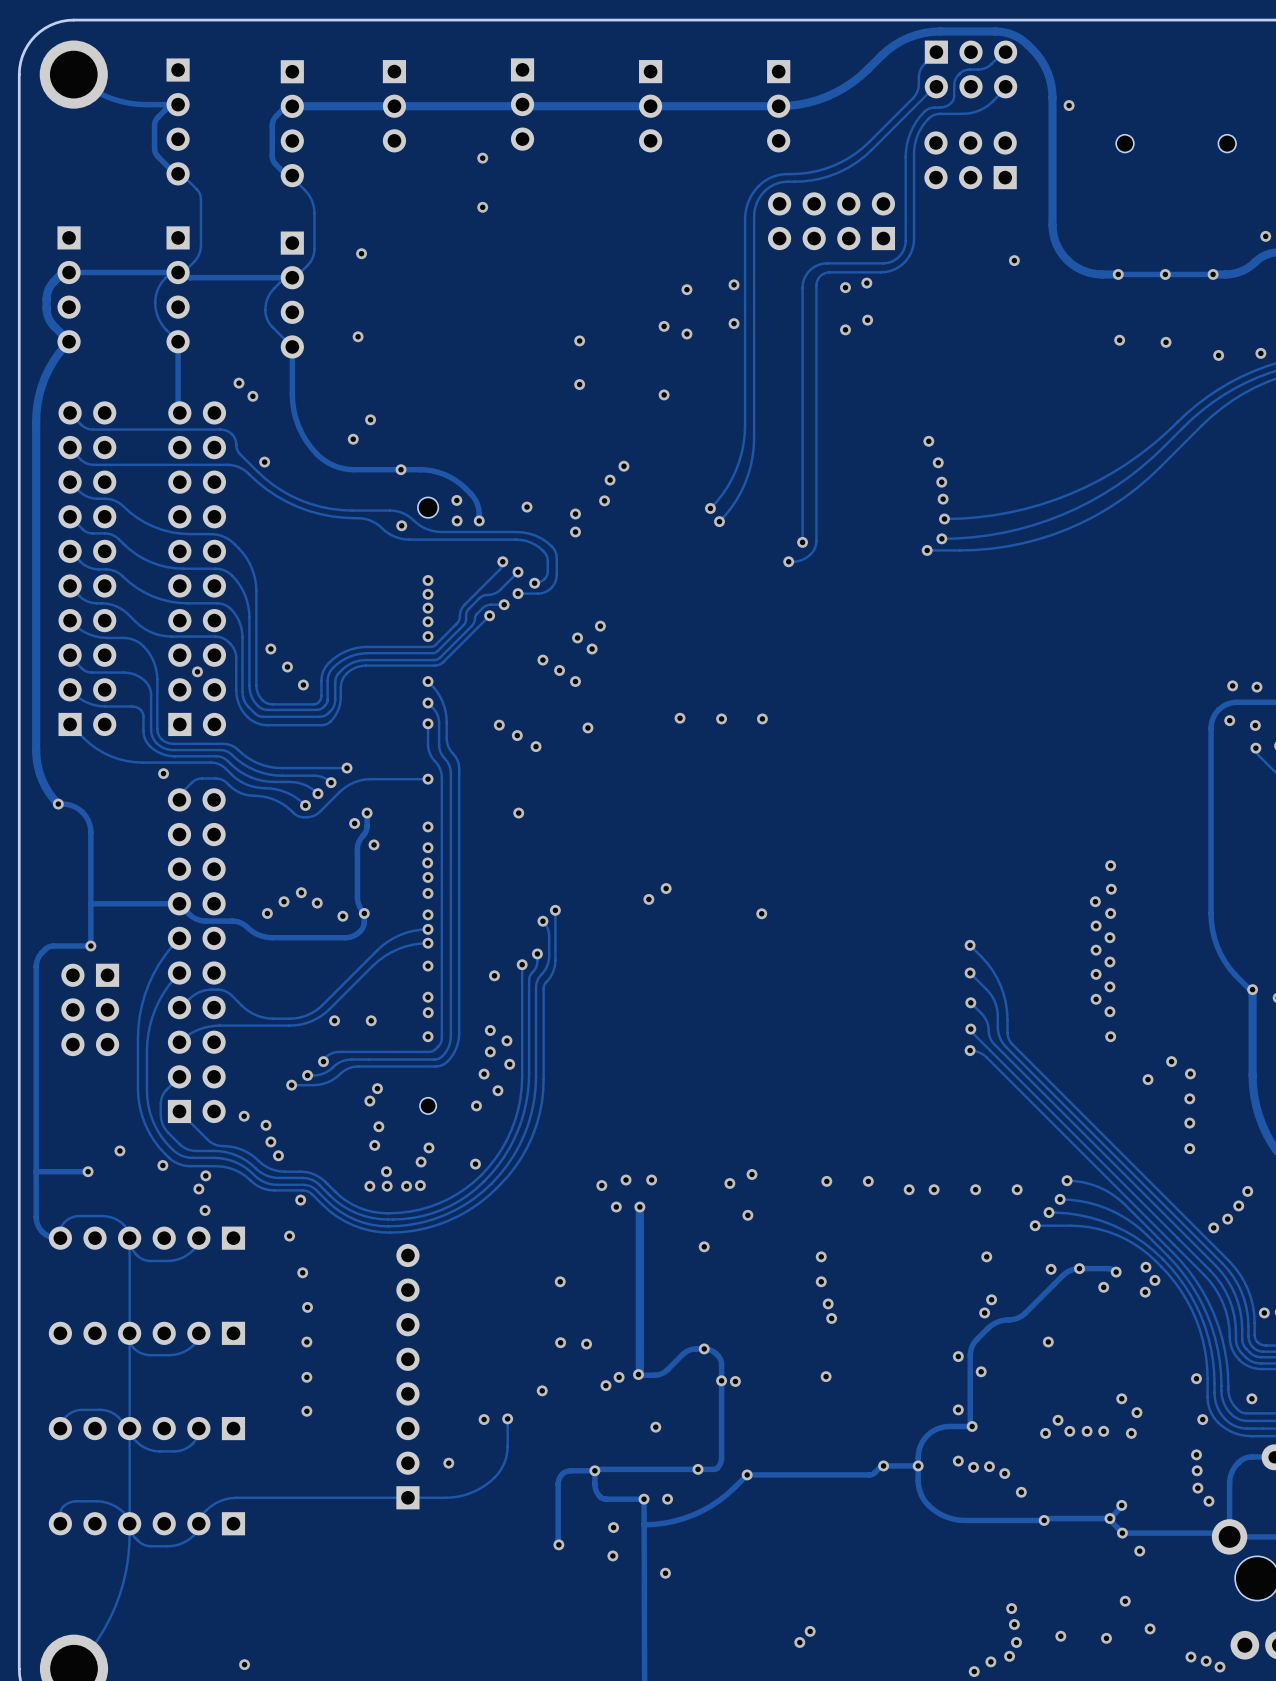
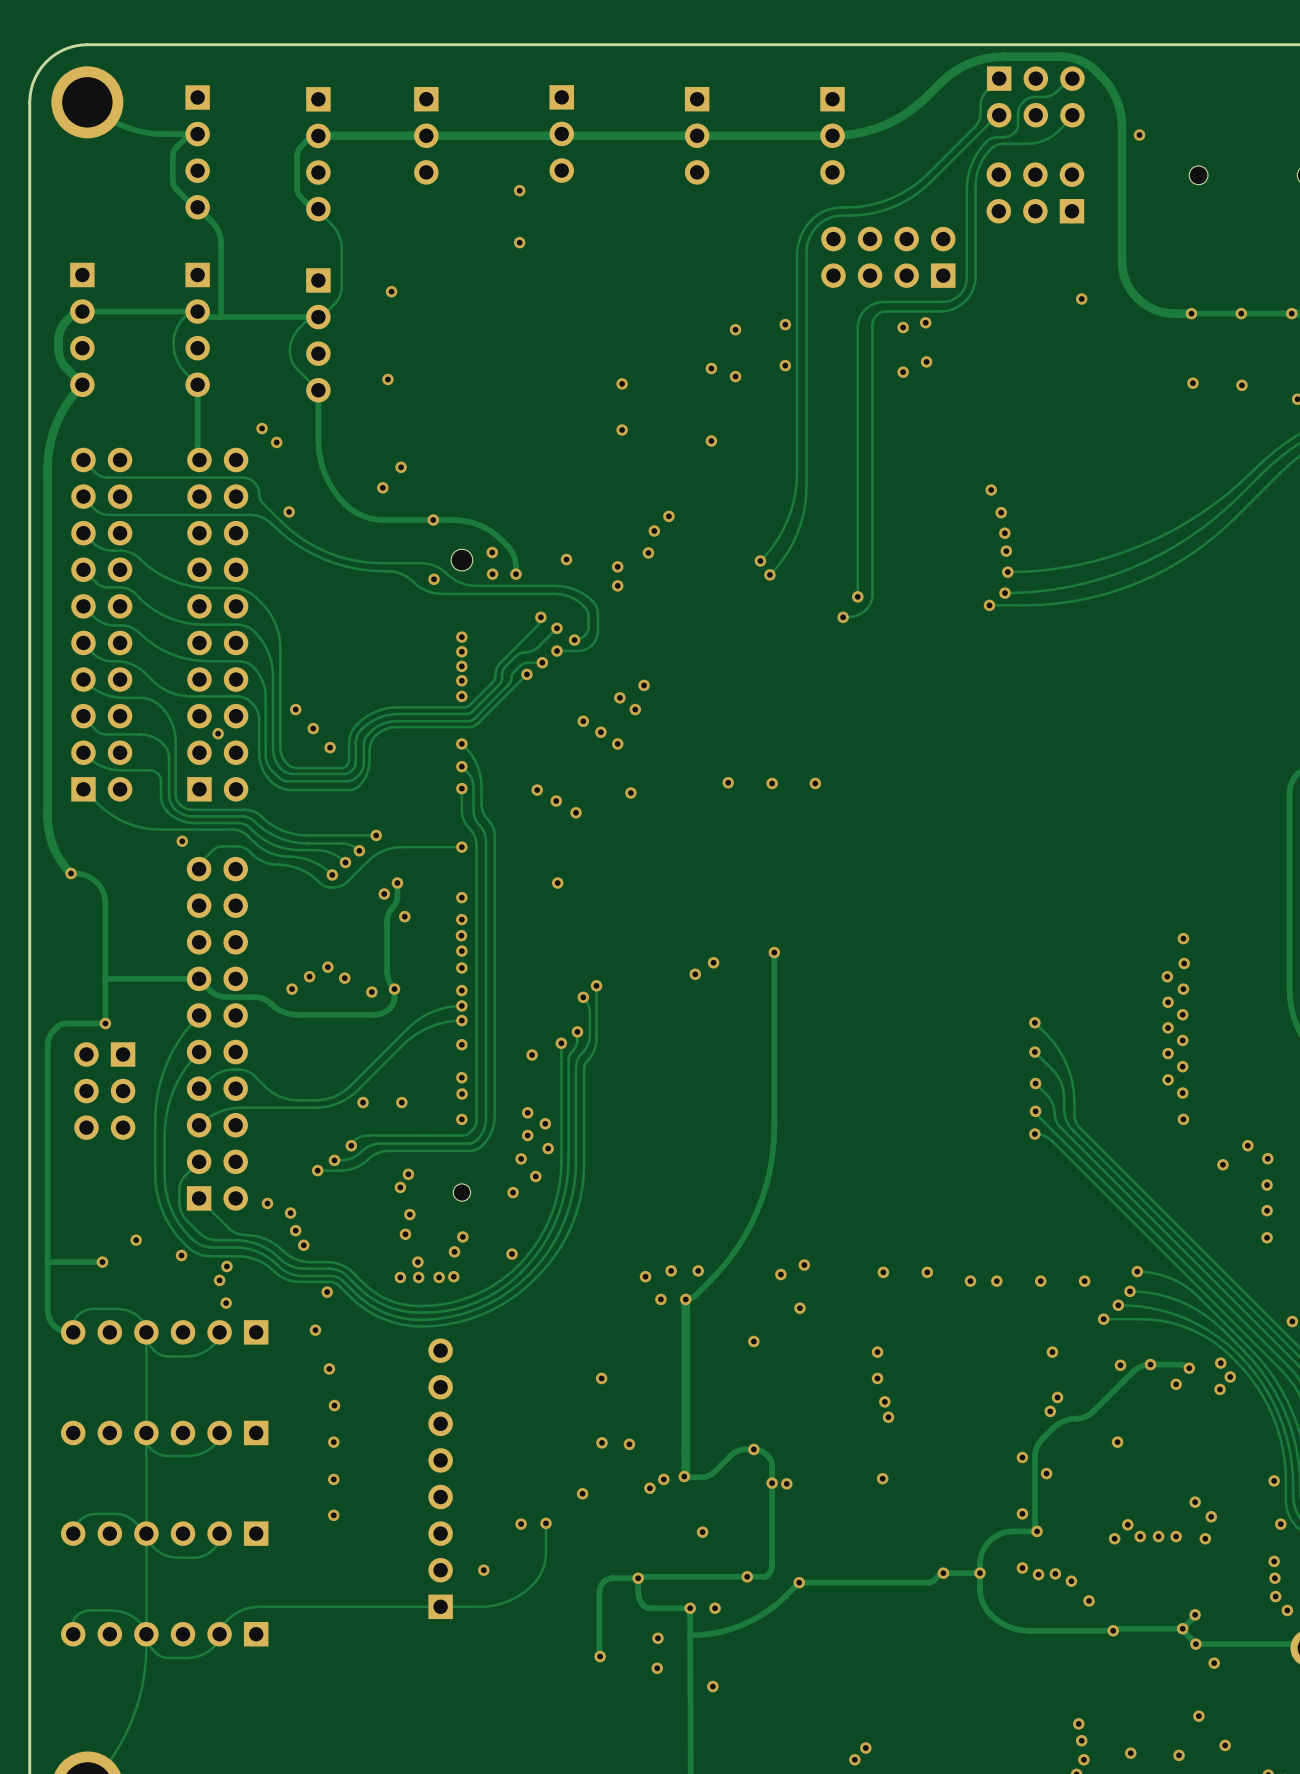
track: none -> (197, 207) (214, 225) (220, 235) (221, 317)
track: (183, 176) (197, 190) (200, 199) (200, 249) (196, 258) (187, 268) -> none
track: none -> (774, 952) (774, 1126) (772, 1155) (766, 1182) (751, 1222) (737, 1247) (710, 1280) (694, 1296) (685, 1299)
via position: (761, 913) -> (774, 952)

